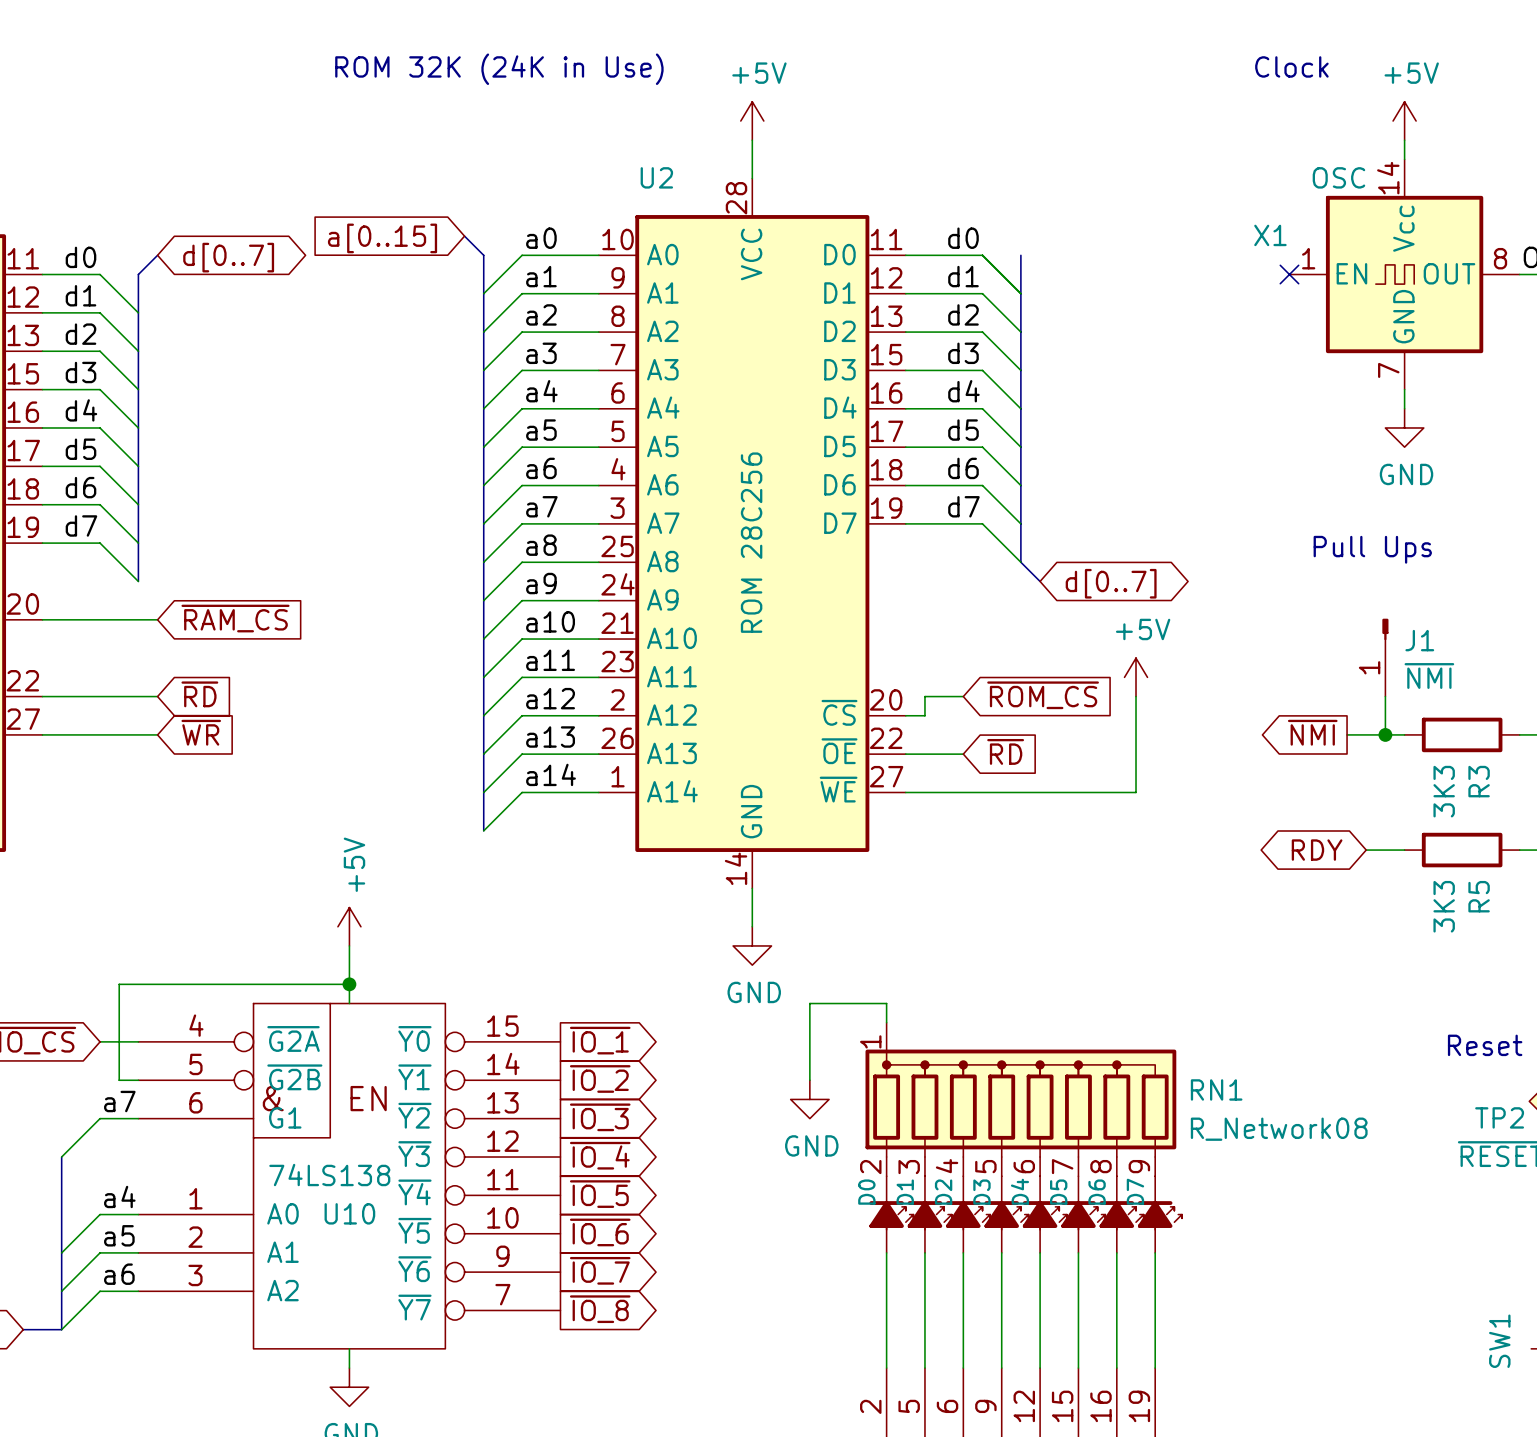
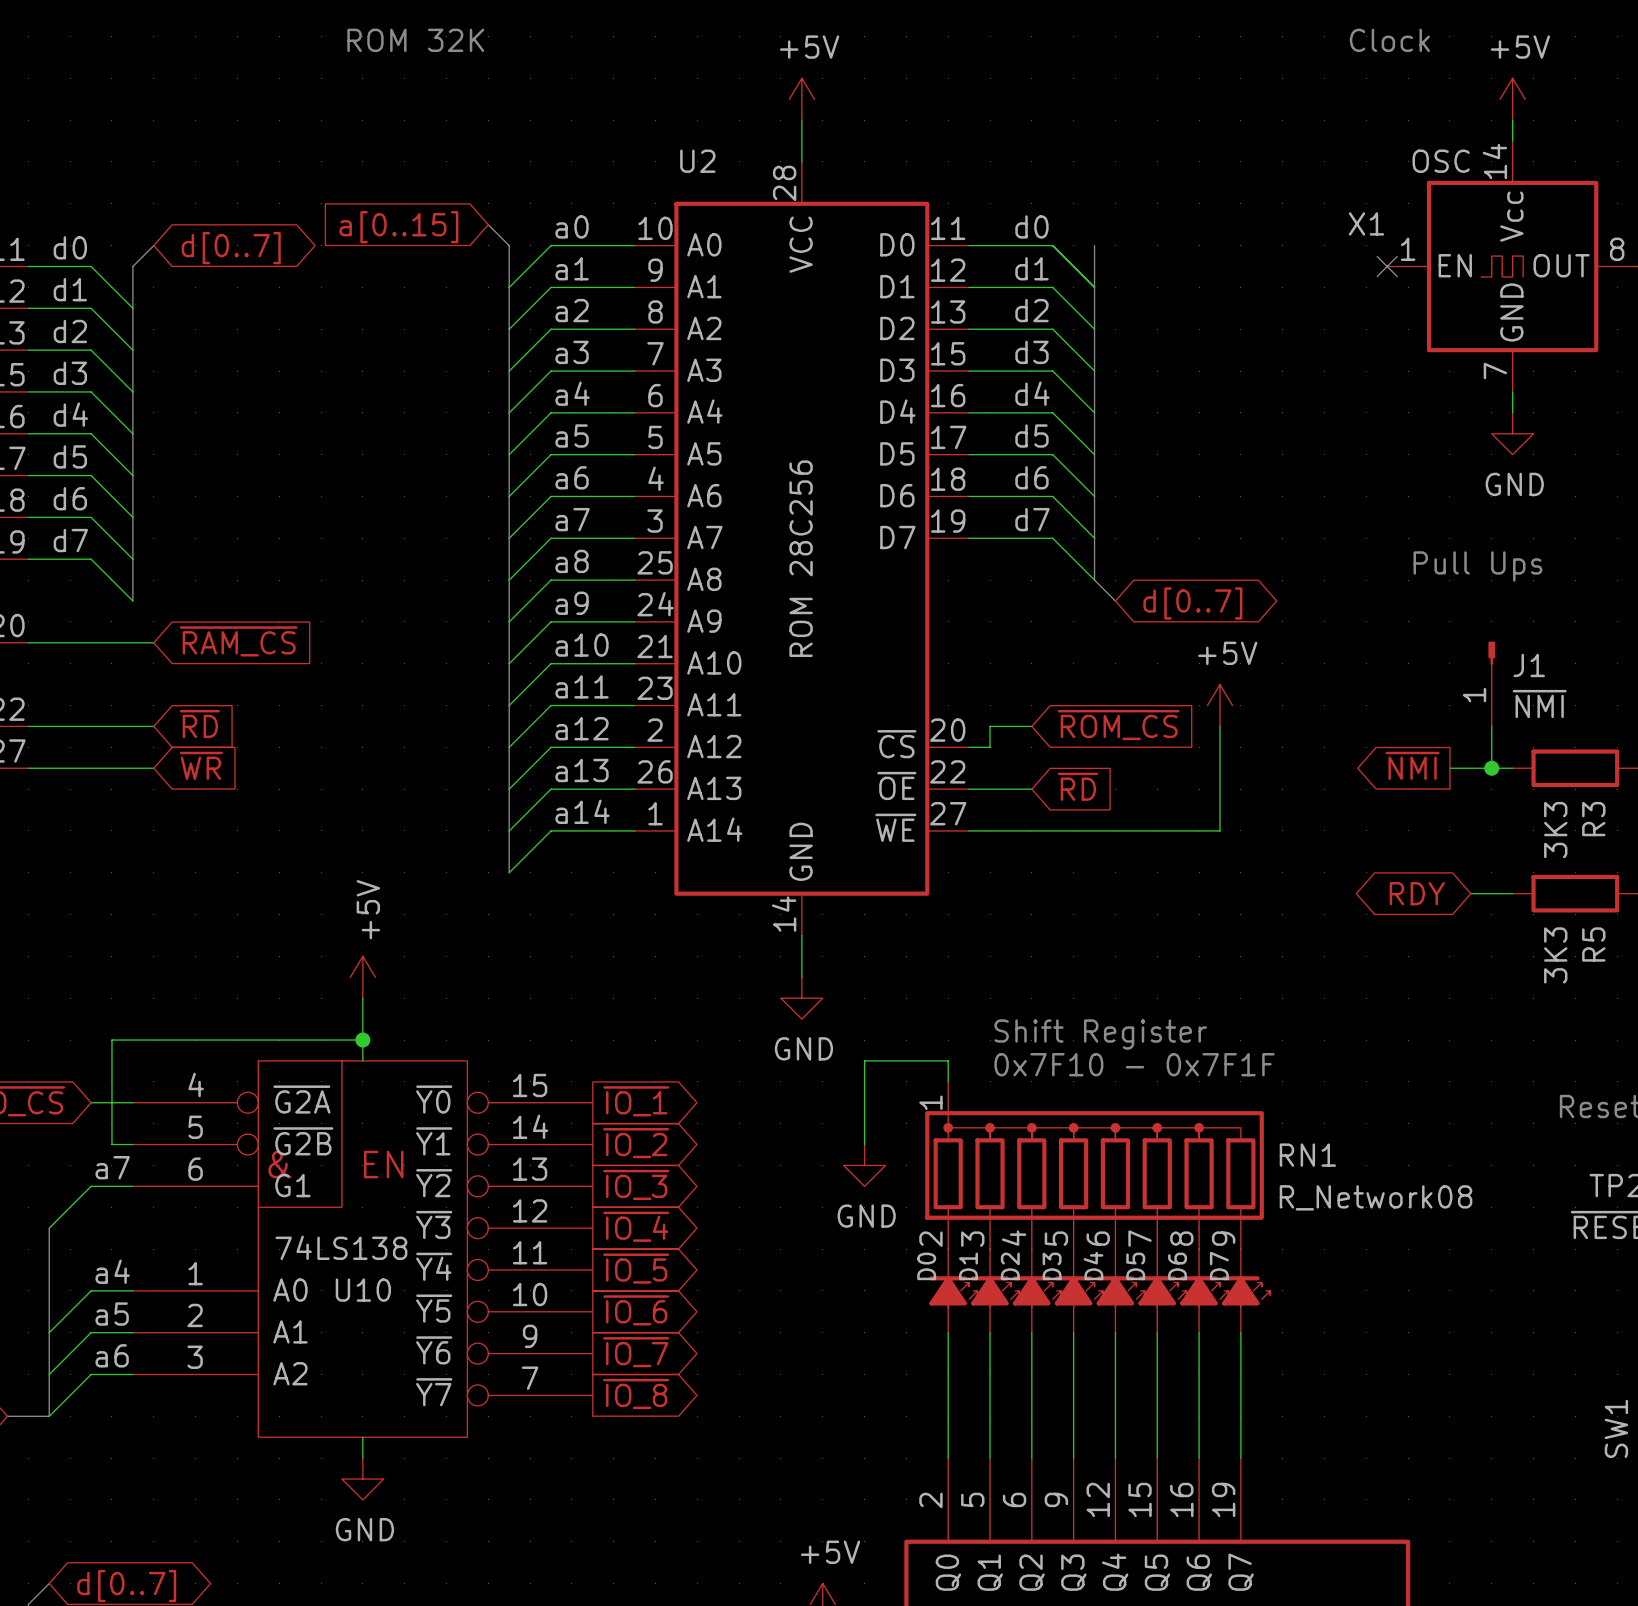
text: ROM 32K (24K in Use) (499, 69) -> ROM 32K (415, 40)
text: none -> Shift Register (1100, 1034)
text: none -> 0x7F10 - 0x7F1F (1134, 1064)

